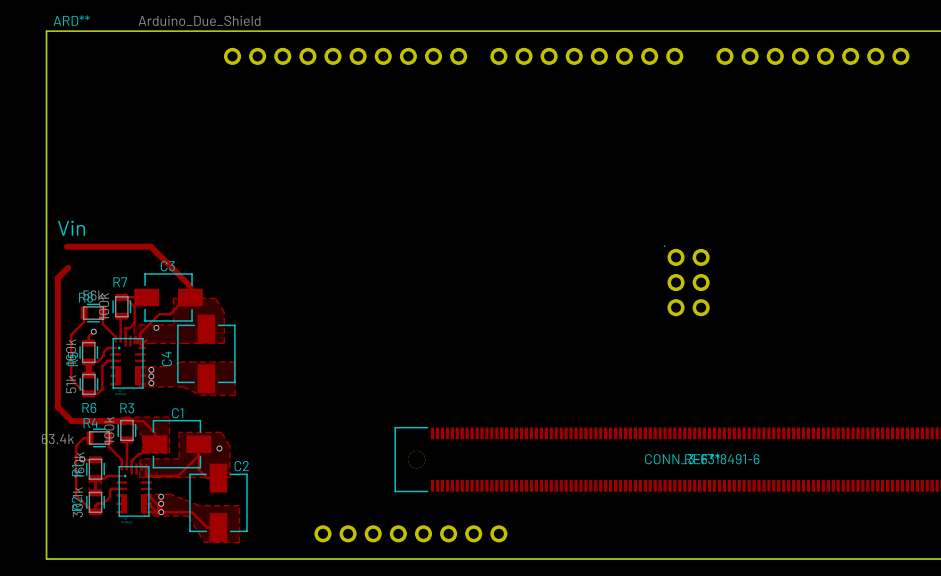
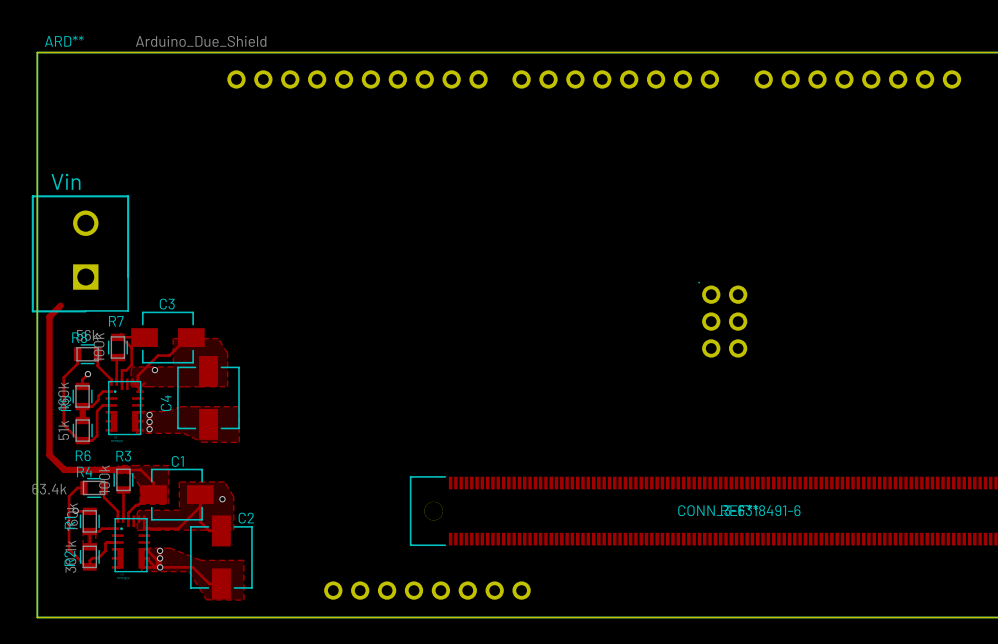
part: none -> (80, 253)
text position: Vin (71, 228) -> Vin (66, 181)
track: (66, 246) (150, 246) (190, 286) (190, 297) -> none

